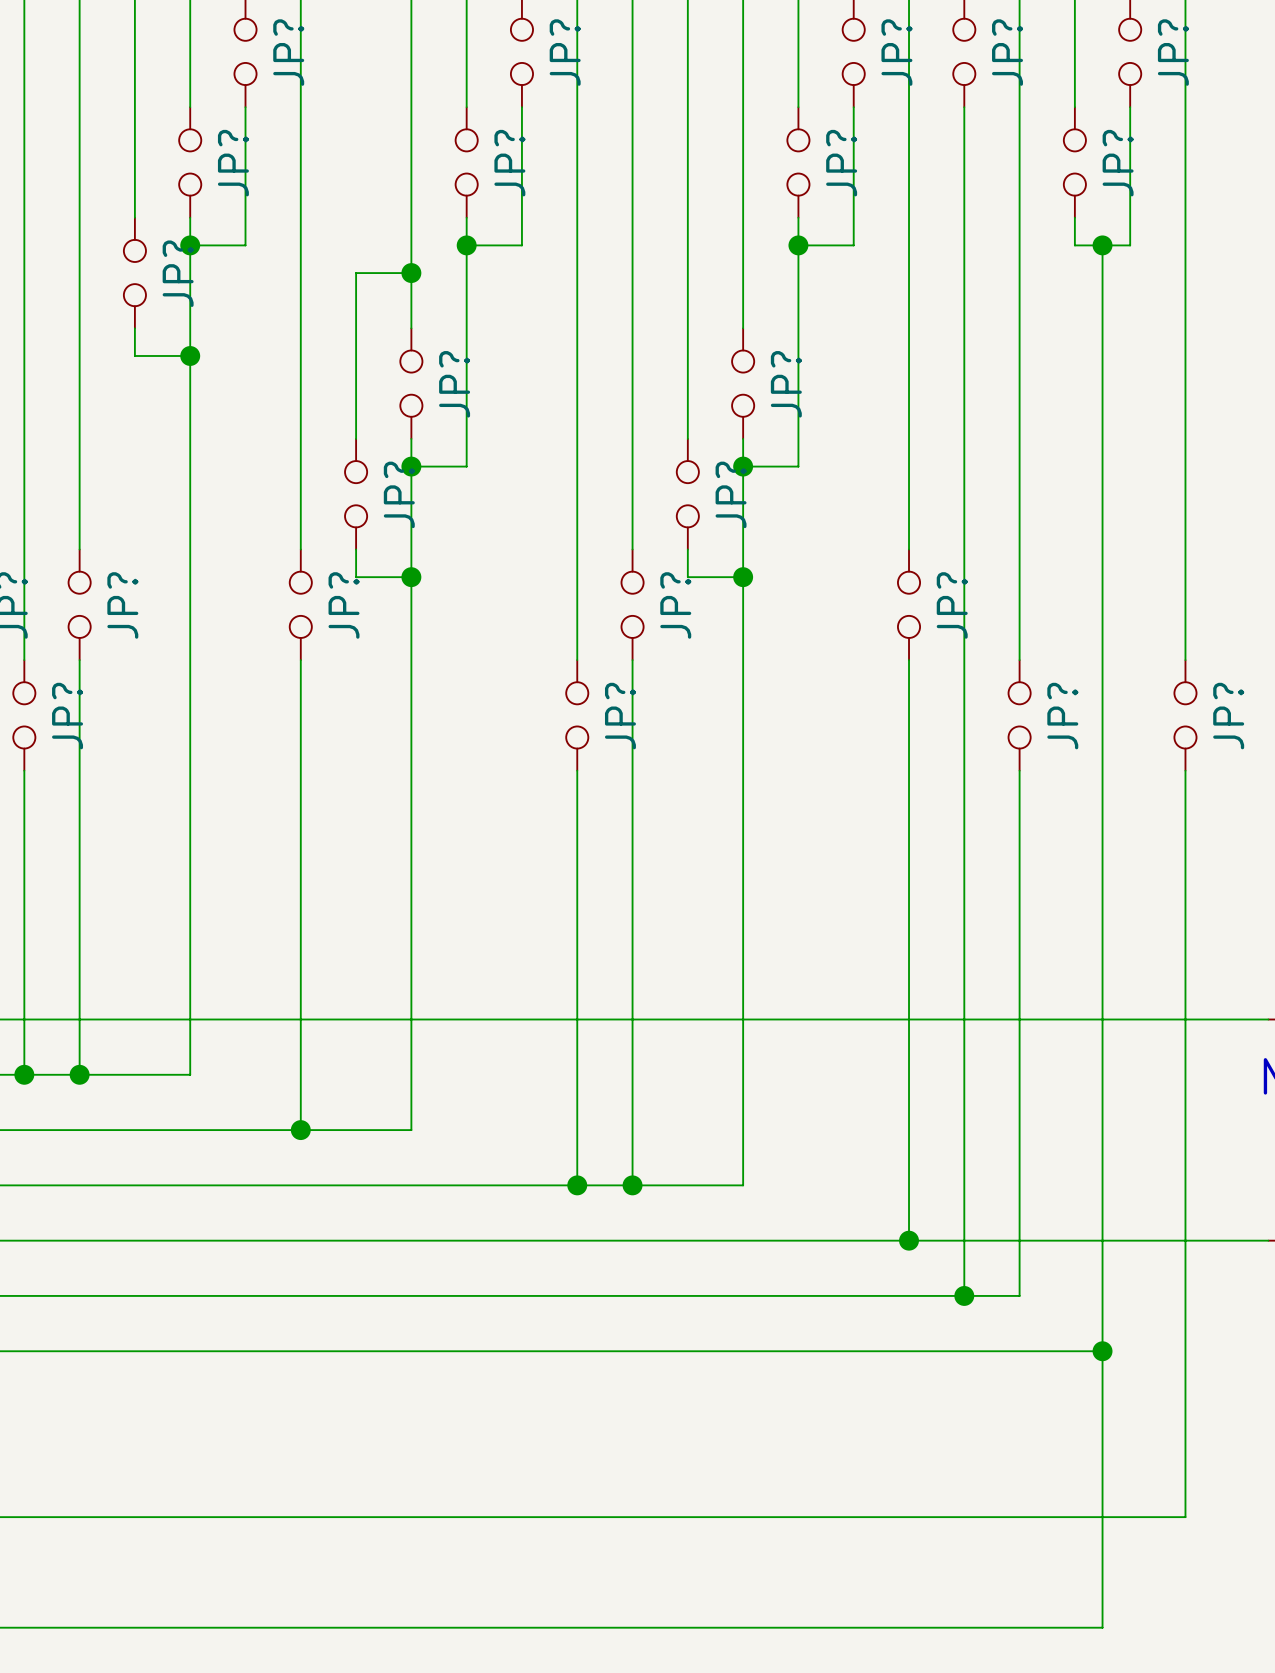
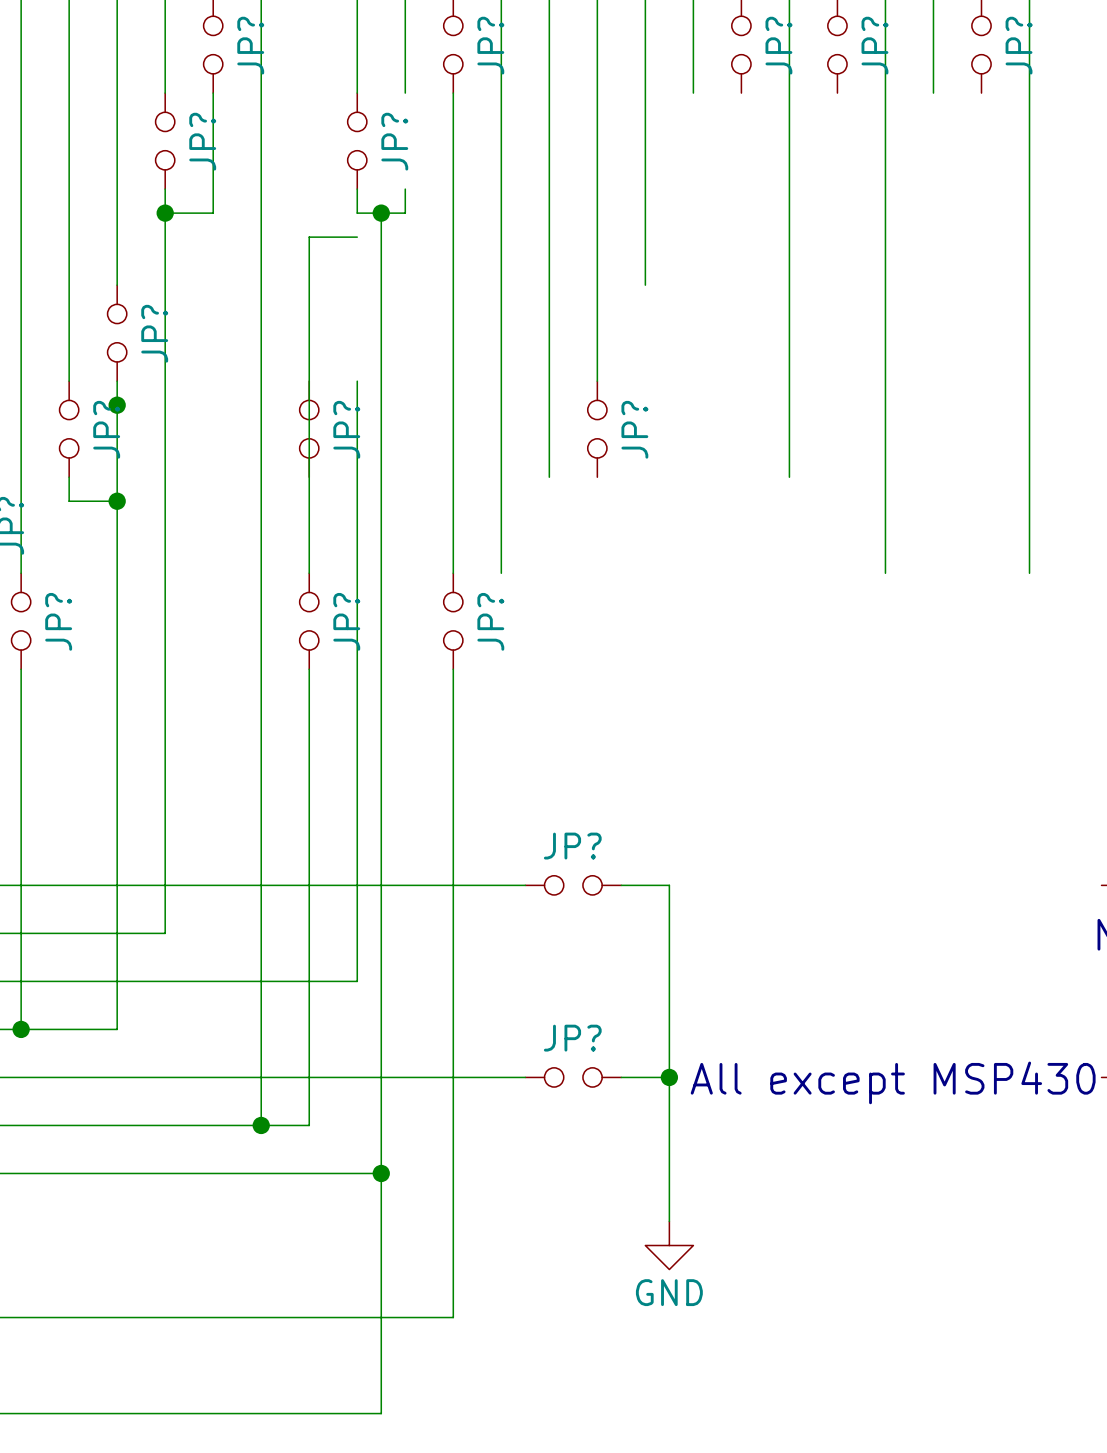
wire: (411, 107) (411, 217) -> (309, 381) (309, 477)
wire: (853, 107) (853, 245) (798, 245) -> none
wire: (964, 107) (964, 1295) -> none
wire: (1130, 107) (1130, 245) (1074, 245) (1074, 217) -> none
JP? position: (466, 162) -> (357, 141)
JP?: (798, 162) -> none
JP?: (1074, 162) -> none
wire: (798, 217) (798, 466) (743, 466) -> none
wire: (411, 245) (411, 328) -> (357, 213) (405, 213)
junction: none -> (381, 213)
junction: (466, 245) -> none
wire: (521, 245) (466, 245) (466, 466) (411, 466) -> (453, 213) (453, 573)
junction: (798, 245) -> none
wire: (1102, 245) (1102, 1627) (439, 1627) -> (381, 213) (381, 1413)
junction: (1102, 245) -> none
JP? position: (134, 273) -> (117, 333)
junction: (411, 273) -> none
wire: (134, 328) (134, 355) (190, 355) -> (117, 285) (117, 189)
junction: (190, 355) -> none
JP?: (411, 383) -> none
JP?: (743, 383) -> none
wire: (79, 438) (79, 549) -> (117, 501) (69, 501) (69, 477)
wire: (743, 438) (743, 1185) (134, 1185) -> (117, 381) (117, 1029)
junction: none -> (117, 405)
junction: (411, 466) -> none
junction: (743, 466) -> none
wire: none -> (261, 477) (261, 573)
wire: (687, 549) (687, 577) (743, 577) -> none
junction: none -> (117, 501)
wire: (356, 577) (411, 577) -> (309, 501) (309, 573)
junction: (411, 577) -> none
junction: (743, 577) -> none
JP? position: (79, 604) -> (69, 429)
JP?: (300, 604) -> none
JP?: (632, 604) -> none
JP?: (909, 604) -> none
wire: (79, 660) (79, 1074) -> none
wire: (632, 660) (632, 1185) -> none
wire: (909, 660) (909, 1240) -> none
JP?: none -> (309, 621)
JP? position: (577, 715) -> (453, 621)
JP?: (1019, 715) -> none
JP?: (1185, 715) -> none
wire: (577, 770) (577, 1185) -> none
wire: (1019, 770) (1019, 1295) (356, 1295) -> (309, 669) (309, 1125)
wire: (1185, 770) (1185, 1517) (521, 1517) -> (453, 669) (453, 1317)
wire: (604, 1019) (715, 1019) -> none
JP?: none -> (573, 885)
wire: (770, 1019) (1268, 1019) -> (669, 885) (669, 1221)
wire: none -> (21, 933) (21, 1029)
junction: (24, 1074) -> none
junction: (79, 1074) -> none
wire: none -> (261, 981) (261, 1125)
junction: (300, 1130) -> none
junction: none -> (21, 1029)
junction: (577, 1185) -> none
junction: (632, 1185) -> none
wire: (604, 1240) (715, 1240) -> none
JP?: none -> (573, 1077)
wire: (770, 1240) (1268, 1240) -> none
junction: none -> (669, 1077)
junction: (909, 1240) -> none
text: none -> All except MSP430 (893, 1082)
junction: none -> (261, 1125)
junction: (964, 1295) -> none
wire: (439, 1351) (1102, 1351) -> none
junction: none -> (381, 1173)
junction: (1102, 1351) -> none
power symbol: none -> GND (669, 1245)

